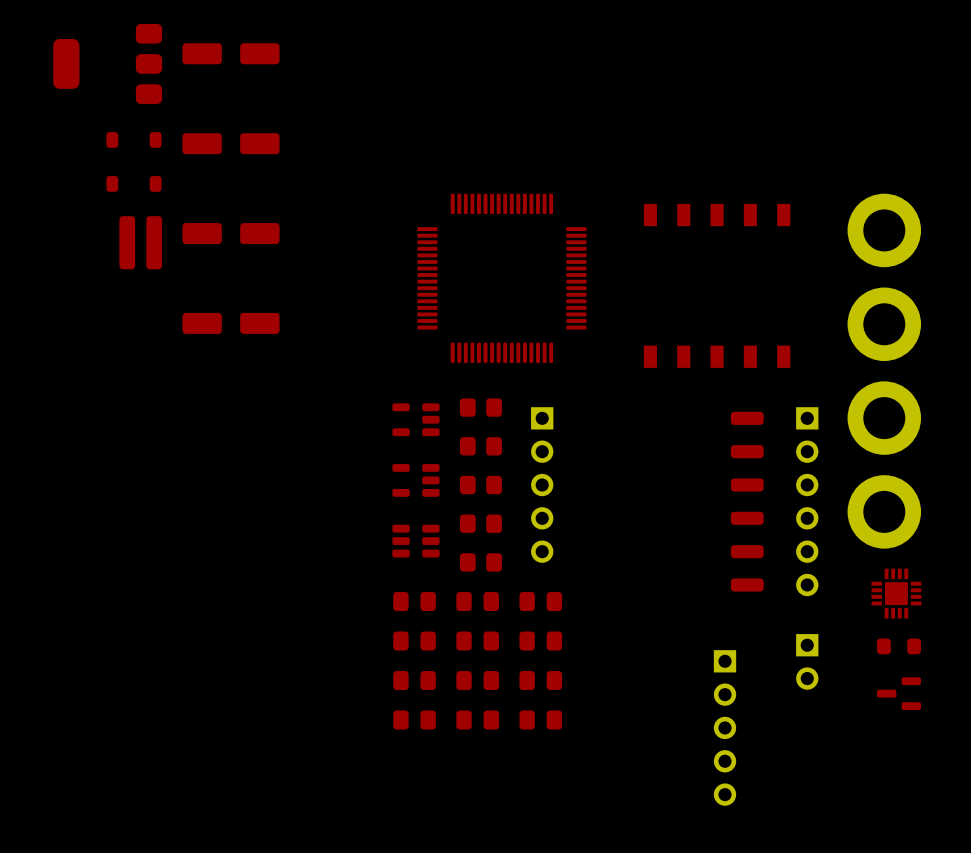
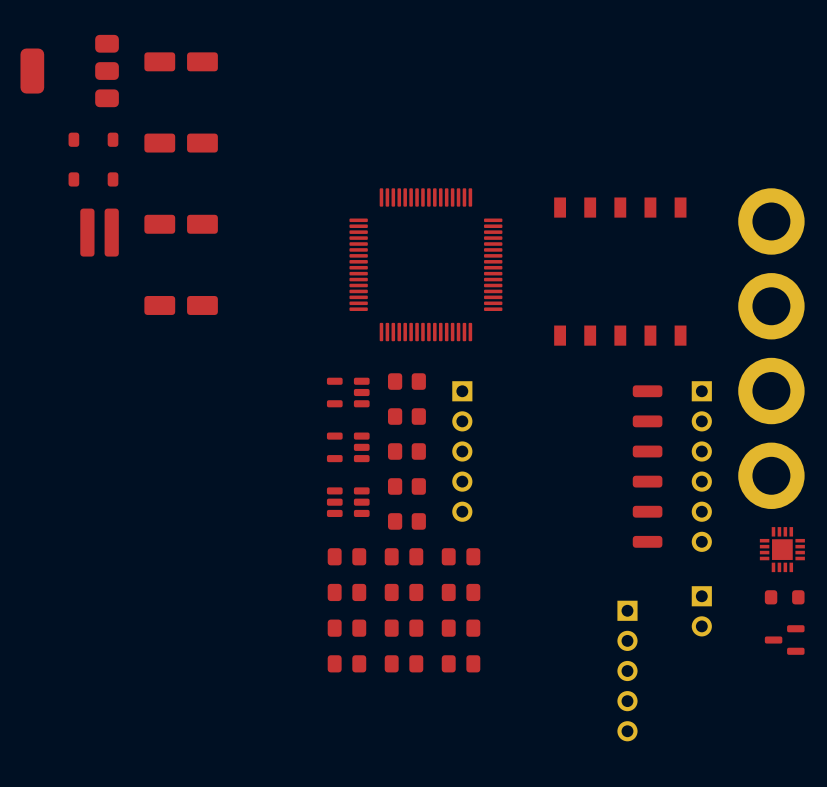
part footprint: [182, 43, 280, 65] -> [144, 52, 218, 72]
part footprint: [182, 133, 280, 155] -> [144, 133, 218, 153]
part footprint: [182, 223, 280, 245] -> [144, 214, 218, 234]
part footprint: [182, 312, 280, 334] -> [144, 296, 218, 315]

